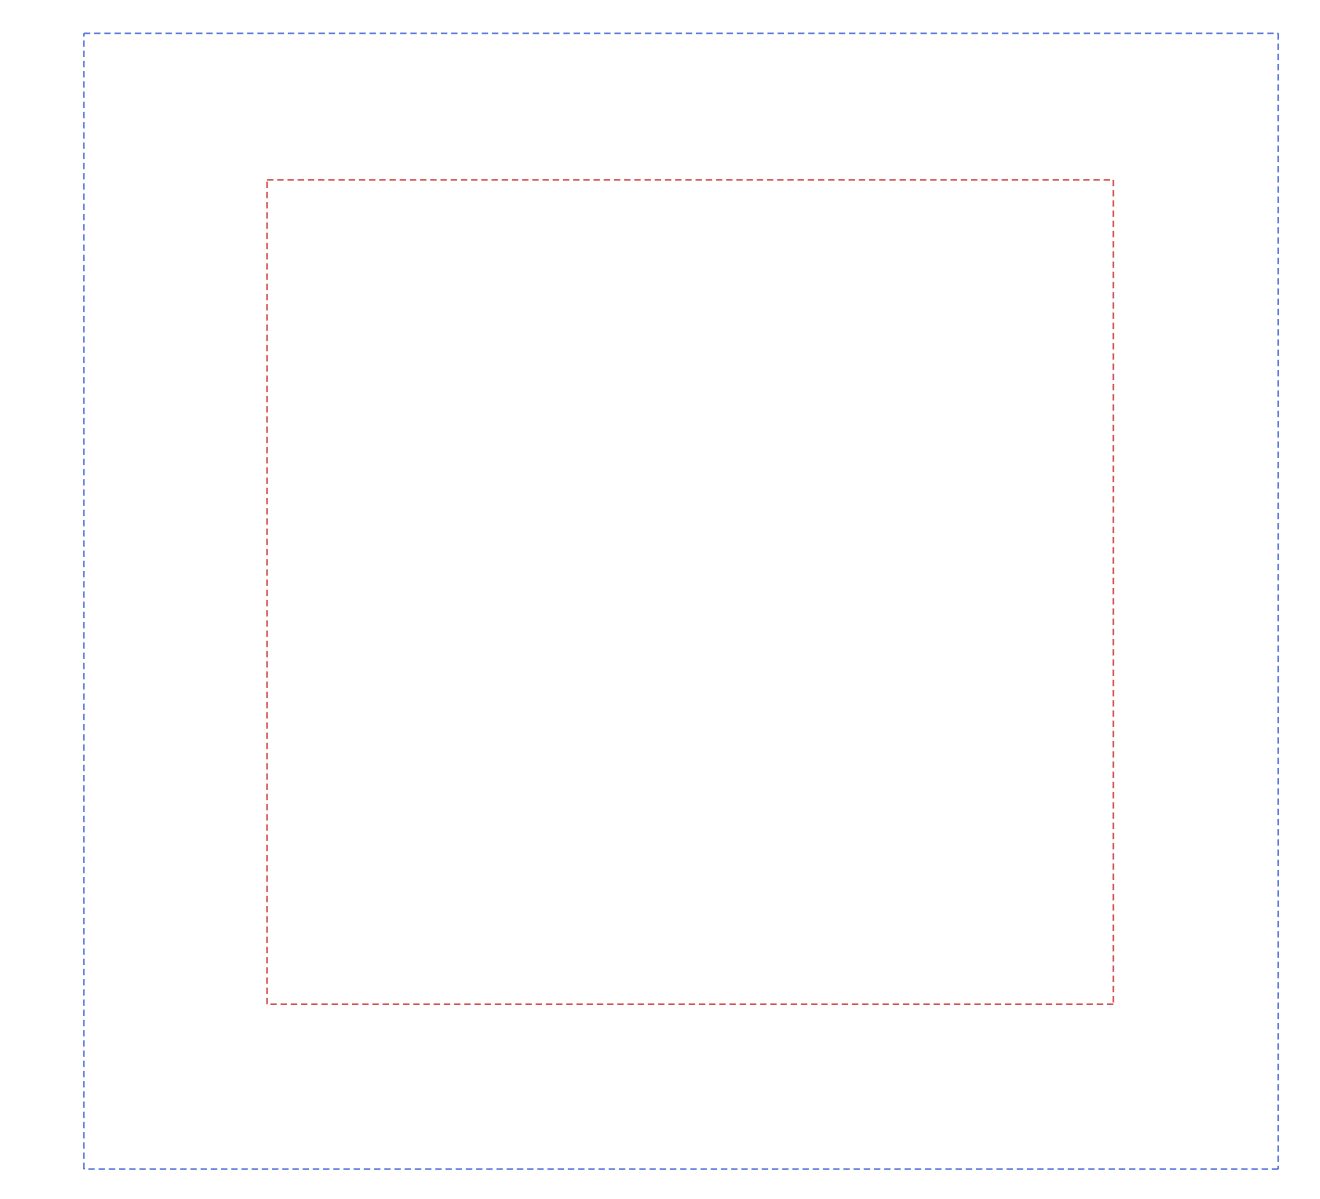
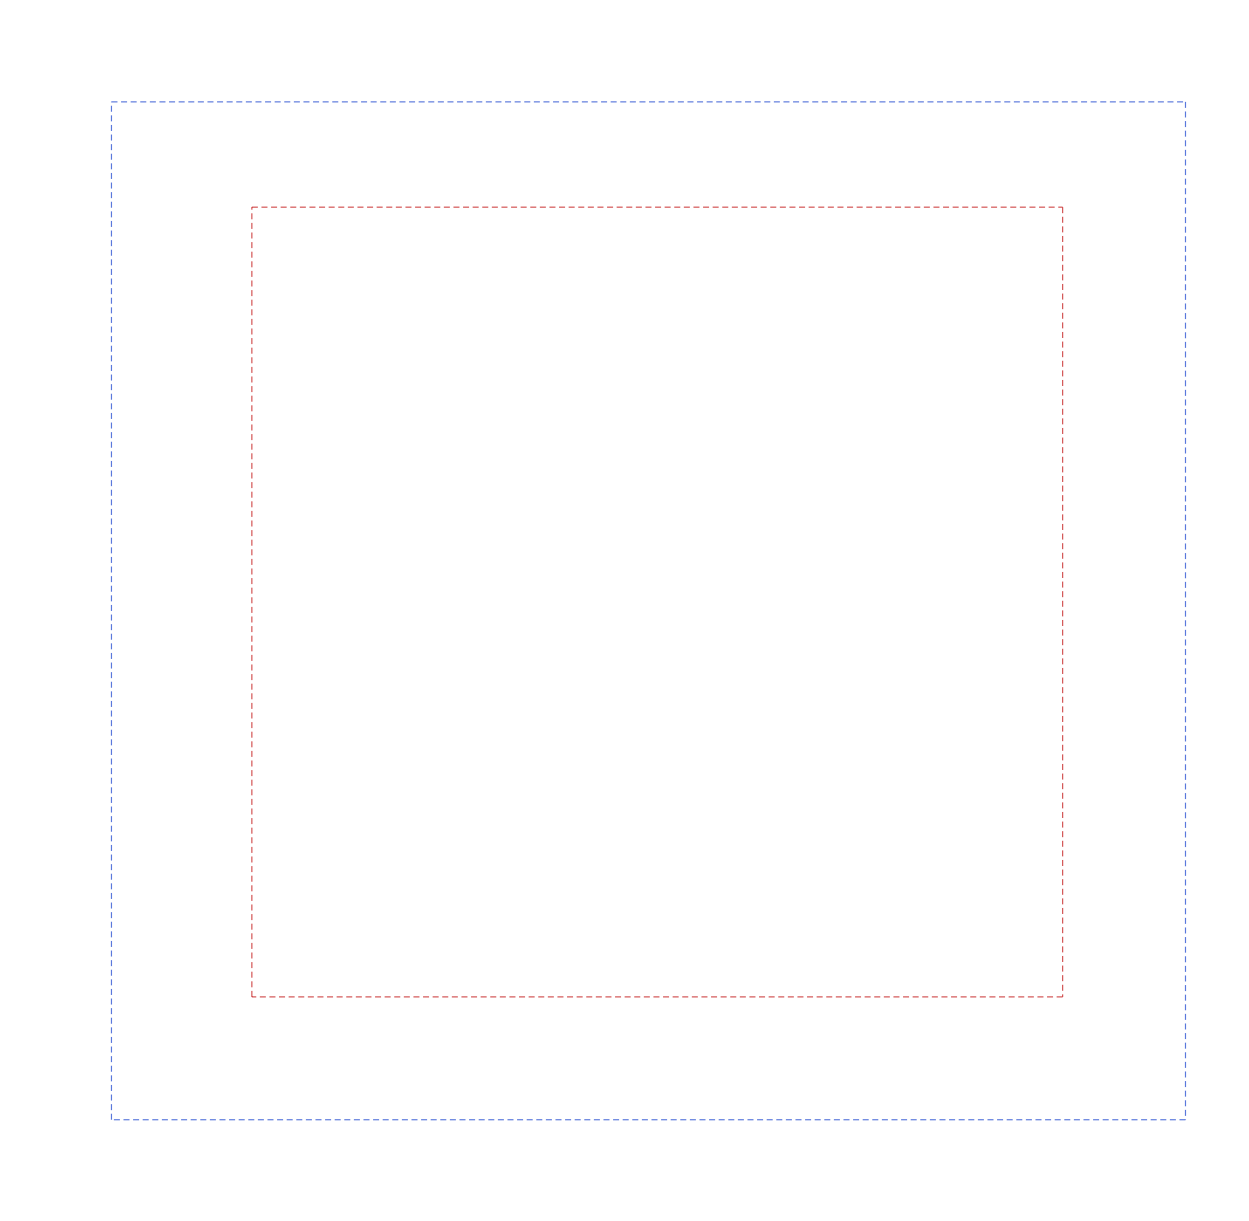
bottom zone outline: (1278, 33) (1278, 1169) (83, 1169) (83, 33) (1278, 33) -> (1185, 101) (1185, 1119) (111, 1119) (111, 101) (1185, 101)

